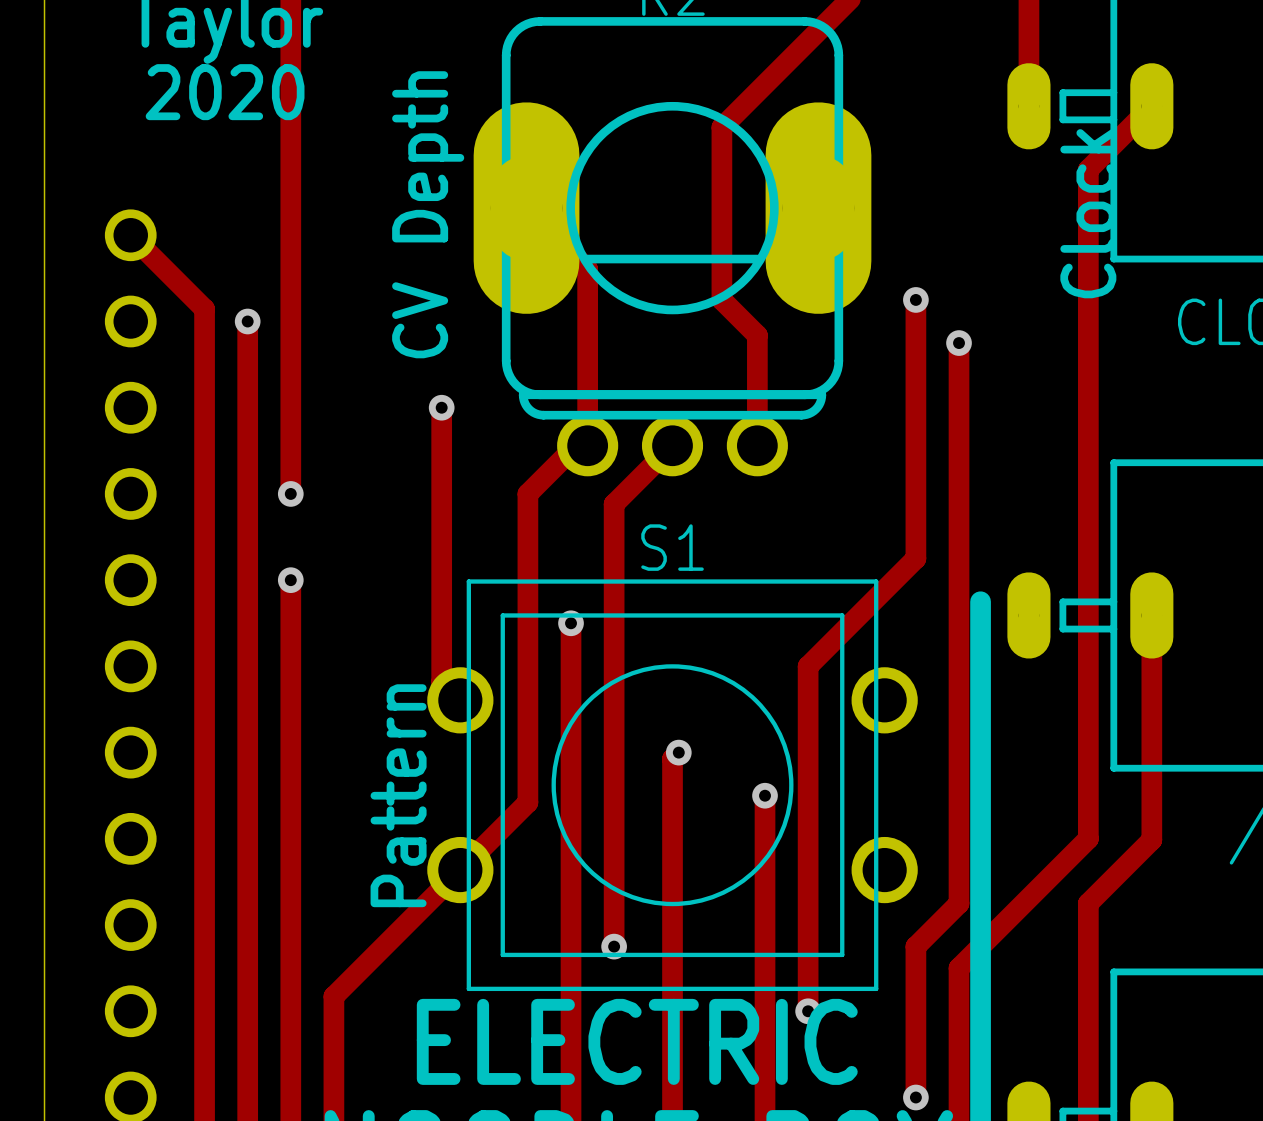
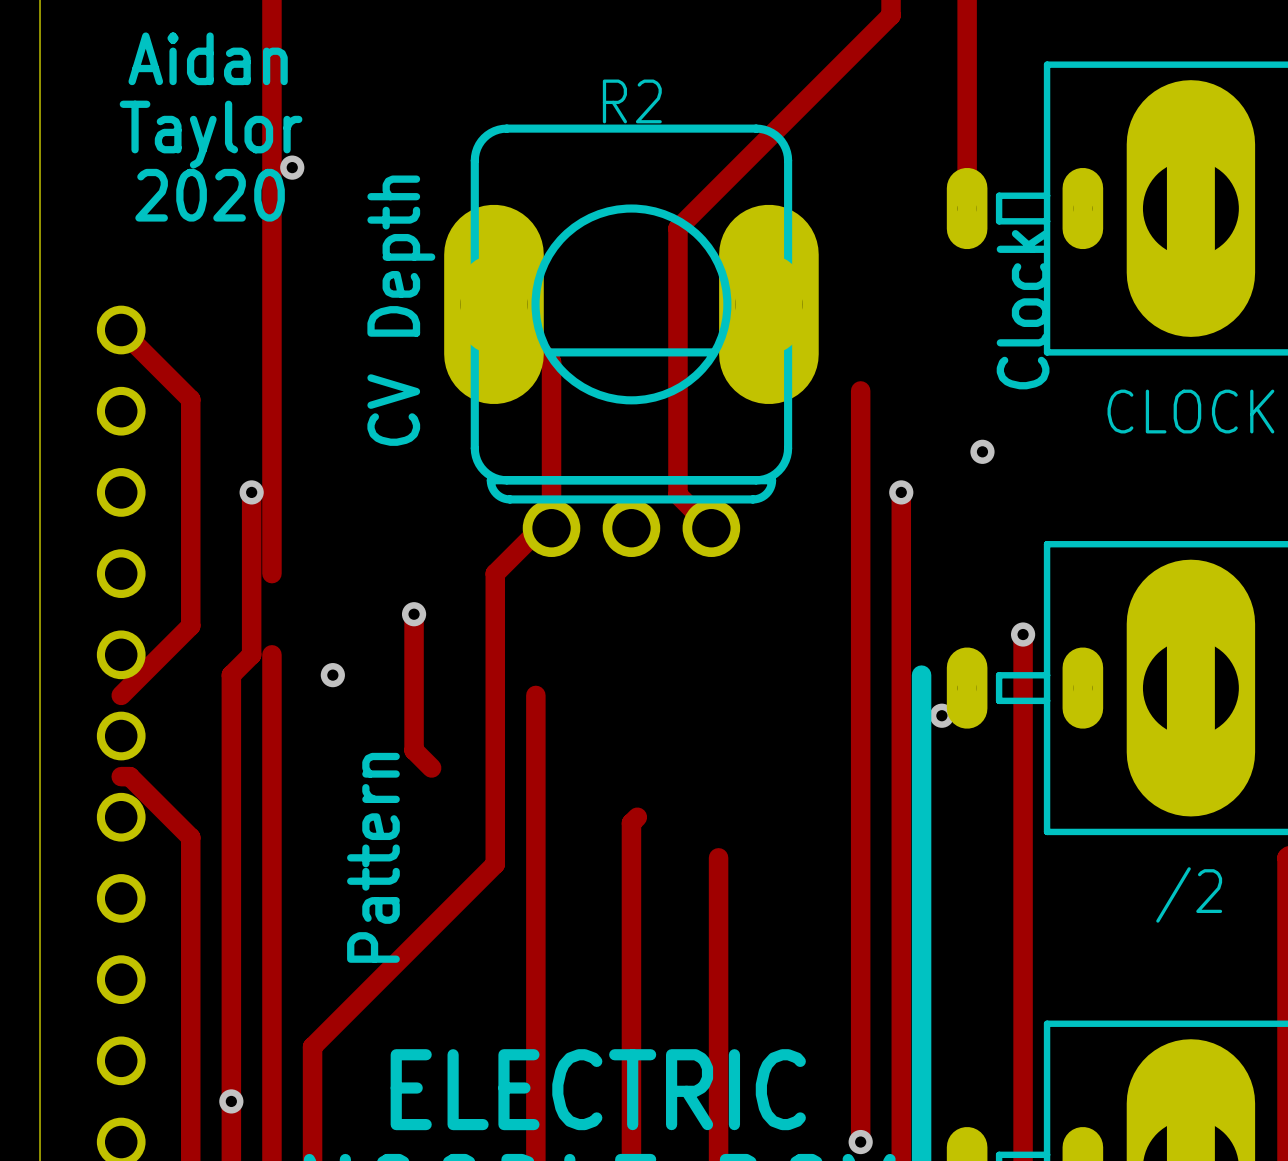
via: none -> (292, 167)
track: (1151, 106) (1088, 169) (1088, 558) -> none
track: (721, 299) (757, 335) (757, 445) -> (677, 390) (677, 494) (711, 528)
via: (915, 299) -> none
track: (247, 321) (247, 601) -> (251, 492) (251, 654) (231, 675)
via: (247, 321) -> none
track: (959, 343) (959, 407) -> none
via: (959, 343) -> none
via: none -> (982, 451)
via: none -> (251, 492)
track: (441, 407) (441, 537) -> none
via: (441, 407) -> none
via: none -> (901, 492)
track: (672, 445) (614, 504) (614, 946) -> none
via: (290, 493) -> none
via: none -> (414, 614)
track: (204, 549) (204, 774) -> (190, 625) (121, 695)
track: (915, 558) (808, 666) (808, 1011) -> (860, 634) (860, 999)
via: none -> (1023, 634)
via: (290, 580) -> none
via: none -> (332, 675)
track: (1151, 615) (1151, 840) (1088, 903) -> none
via: (571, 623) -> none
via: none -> (941, 715)
track: none -> (121, 776) (129, 776) (190, 837)
via: (678, 752) -> none
S1: (672, 785) -> none
via: (765, 795) -> none
track: (1088, 838) (959, 968) -> (1023, 898) (1023, 959)
track: (959, 903) (915, 946) -> (901, 959) (901, 1020)
via: (614, 946) -> none
via: (808, 1011) -> none
via: none -> (231, 1101)

